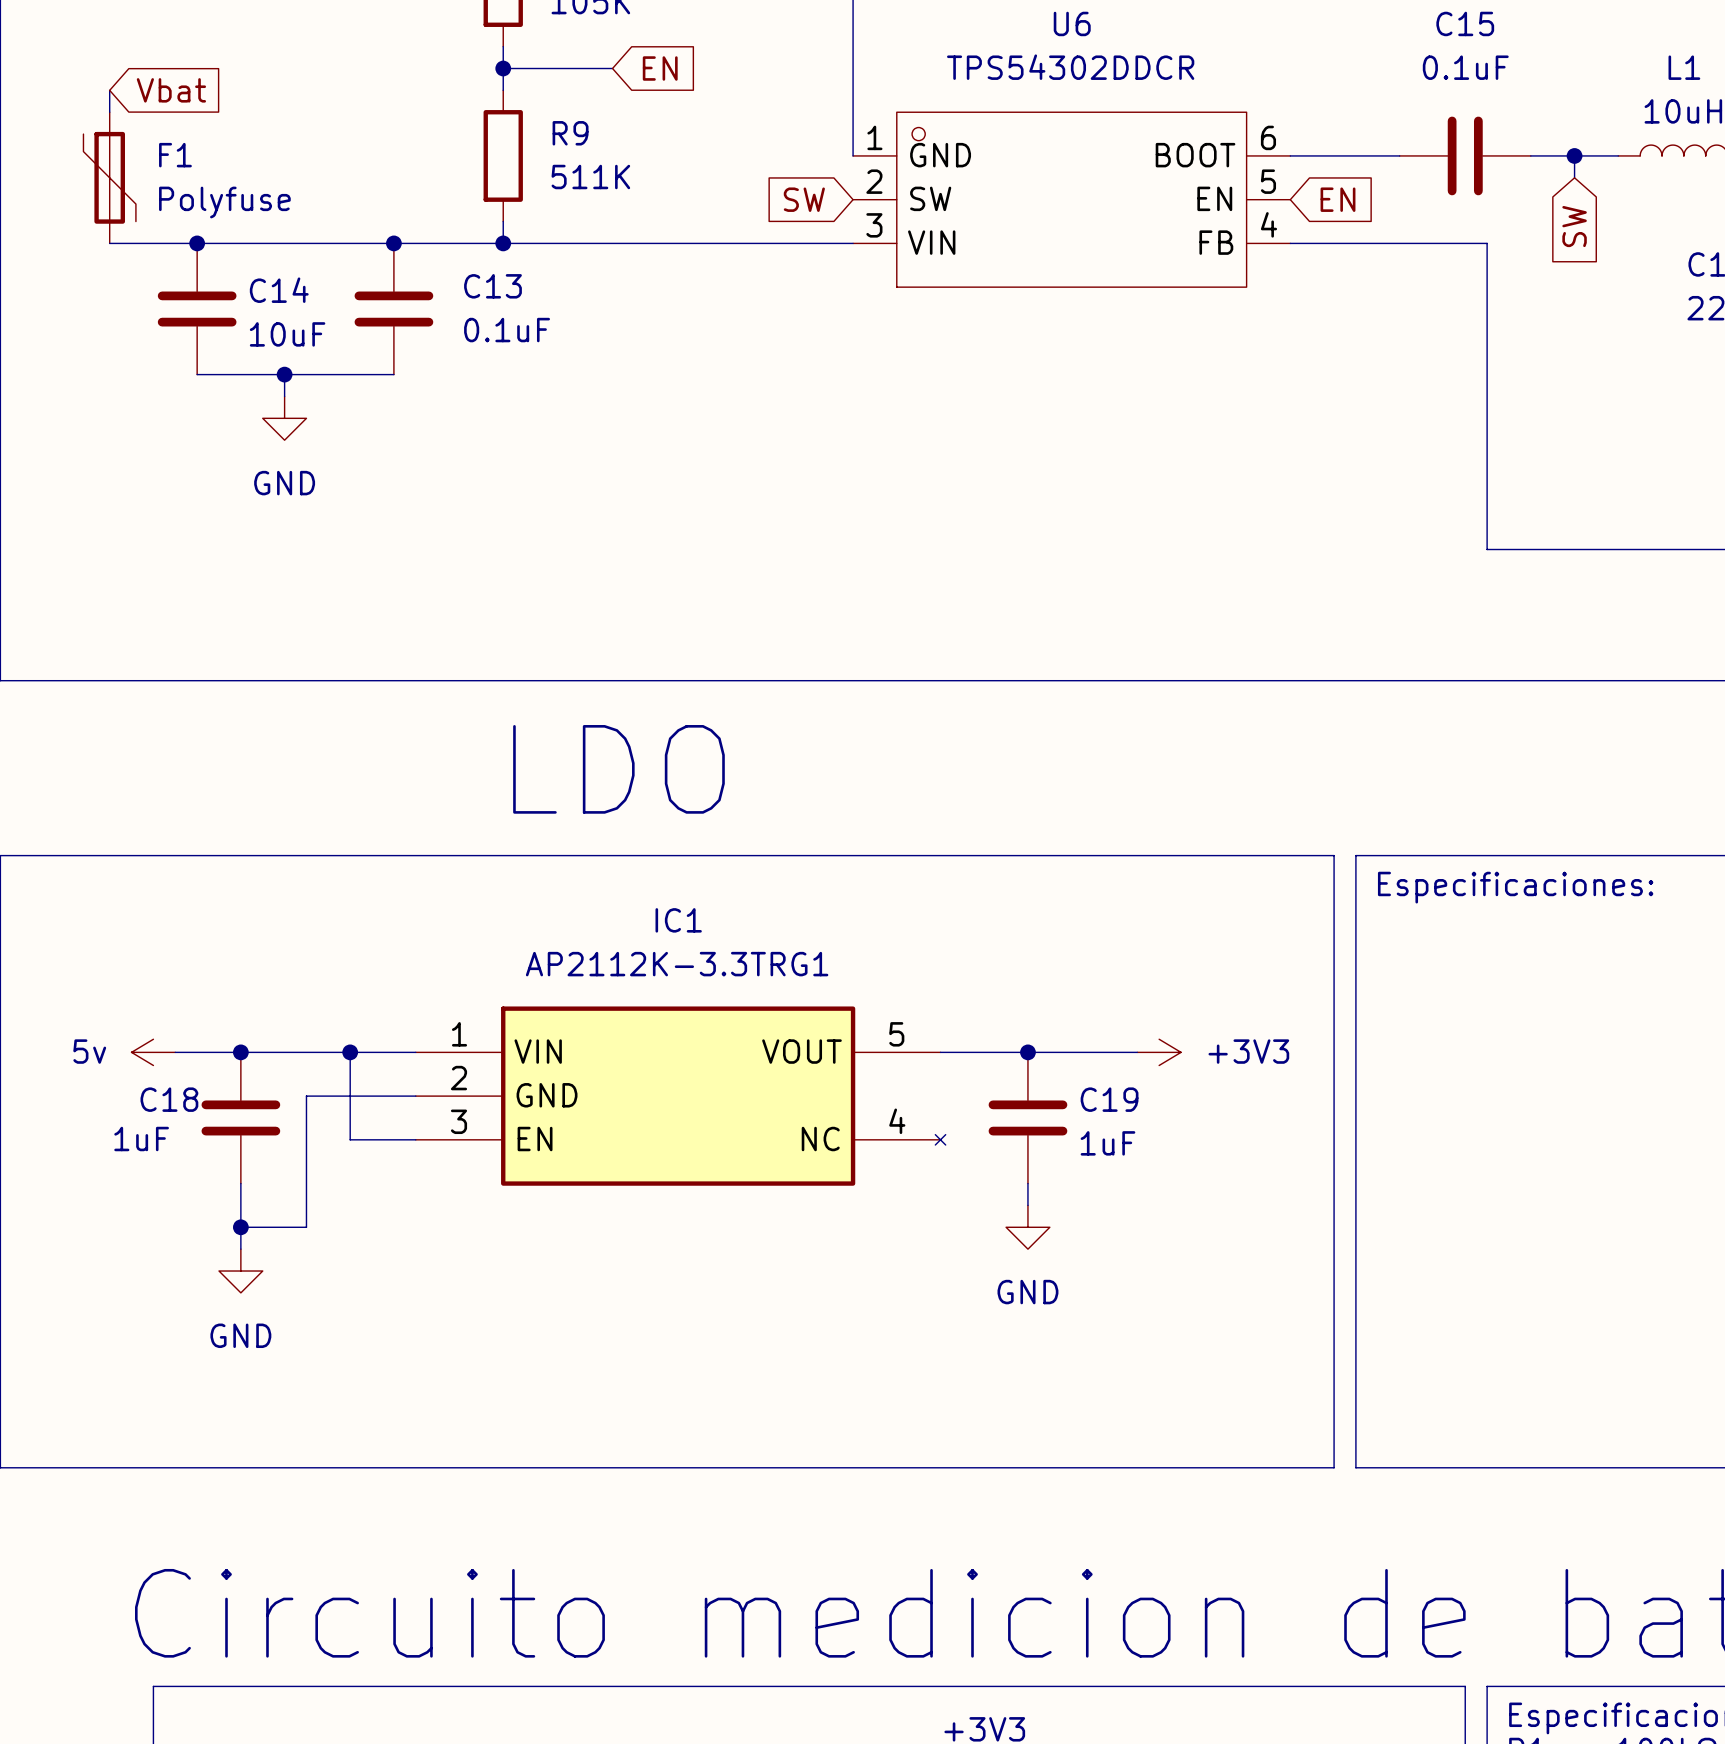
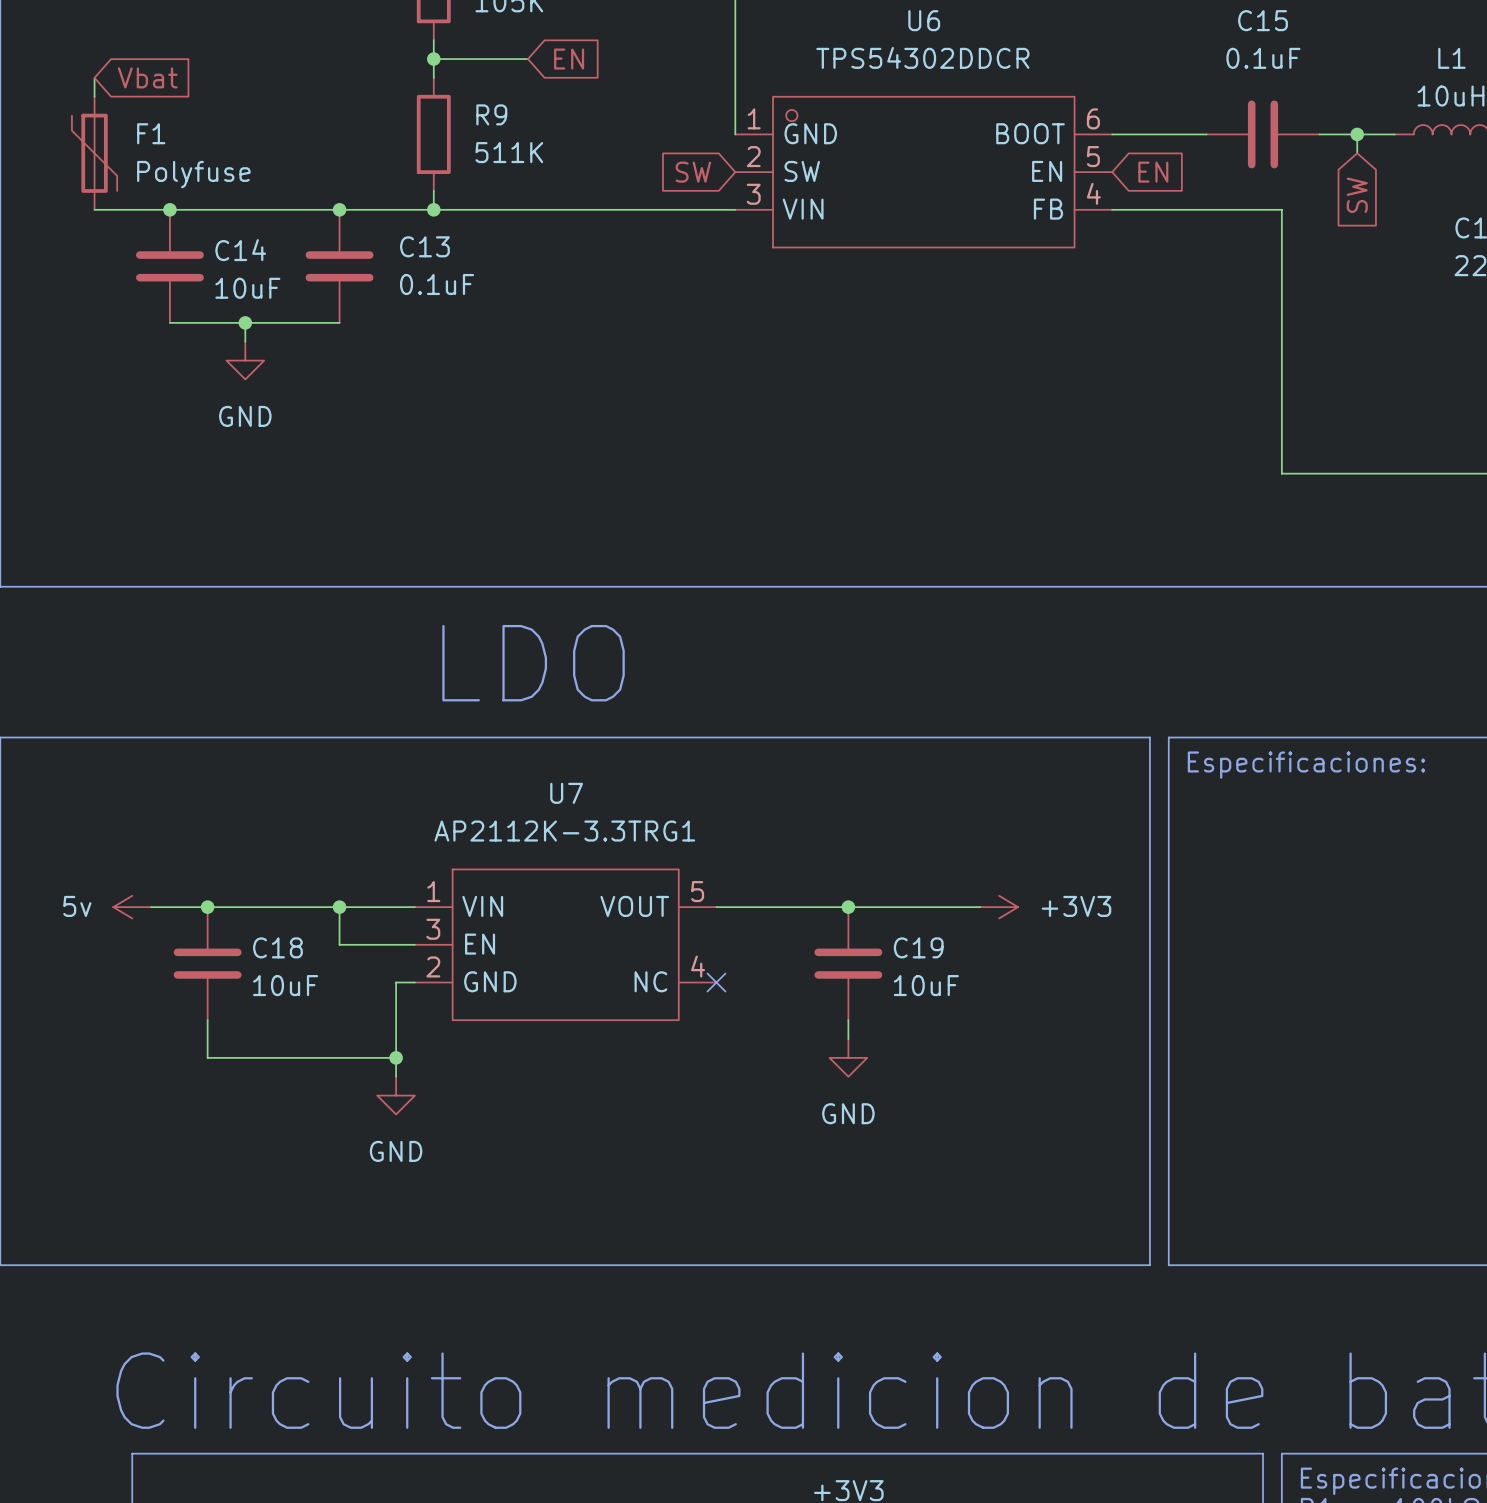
wire: (350, 1052) (350, 1139) (415, 1139) -> none
junction position: (350, 1052) -> (339, 907)
wire: none -> (339, 907) (339, 944)
junction position: (1027, 1052) -> (848, 907)
wire: (393, 1096) (306, 1096) (306, 1227) -> (396, 1057) (264, 1057)
U7: none -> AP2112K-3.3TRG1 (565, 944)
IC1: AP2112K-3.3TRG1 (680, 1096) -> none
C18 name position: C18 (169, 1099) -> C18 (277, 947)
C19 position: (1027, 1117) -> (848, 963)
C18 value: 1uF (141, 1139) -> 10uF (285, 985)
wire: none -> (414, 982) (396, 982) (396, 1076)
no-connect mark: none -> (716, 982)
C19 value: 1uF (1107, 1143) -> 10uF (926, 985)
wire: (1027, 1183) (1027, 1205) -> (848, 1020) (848, 1039)
wire: (240, 1227) (240, 1249) -> none
junction: (240, 1227) -> none
junction: none -> (396, 1057)
power symbol position: GND (1027, 1227) -> GND (848, 1057)
power symbol position: GND (240, 1271) -> GND (396, 1095)

